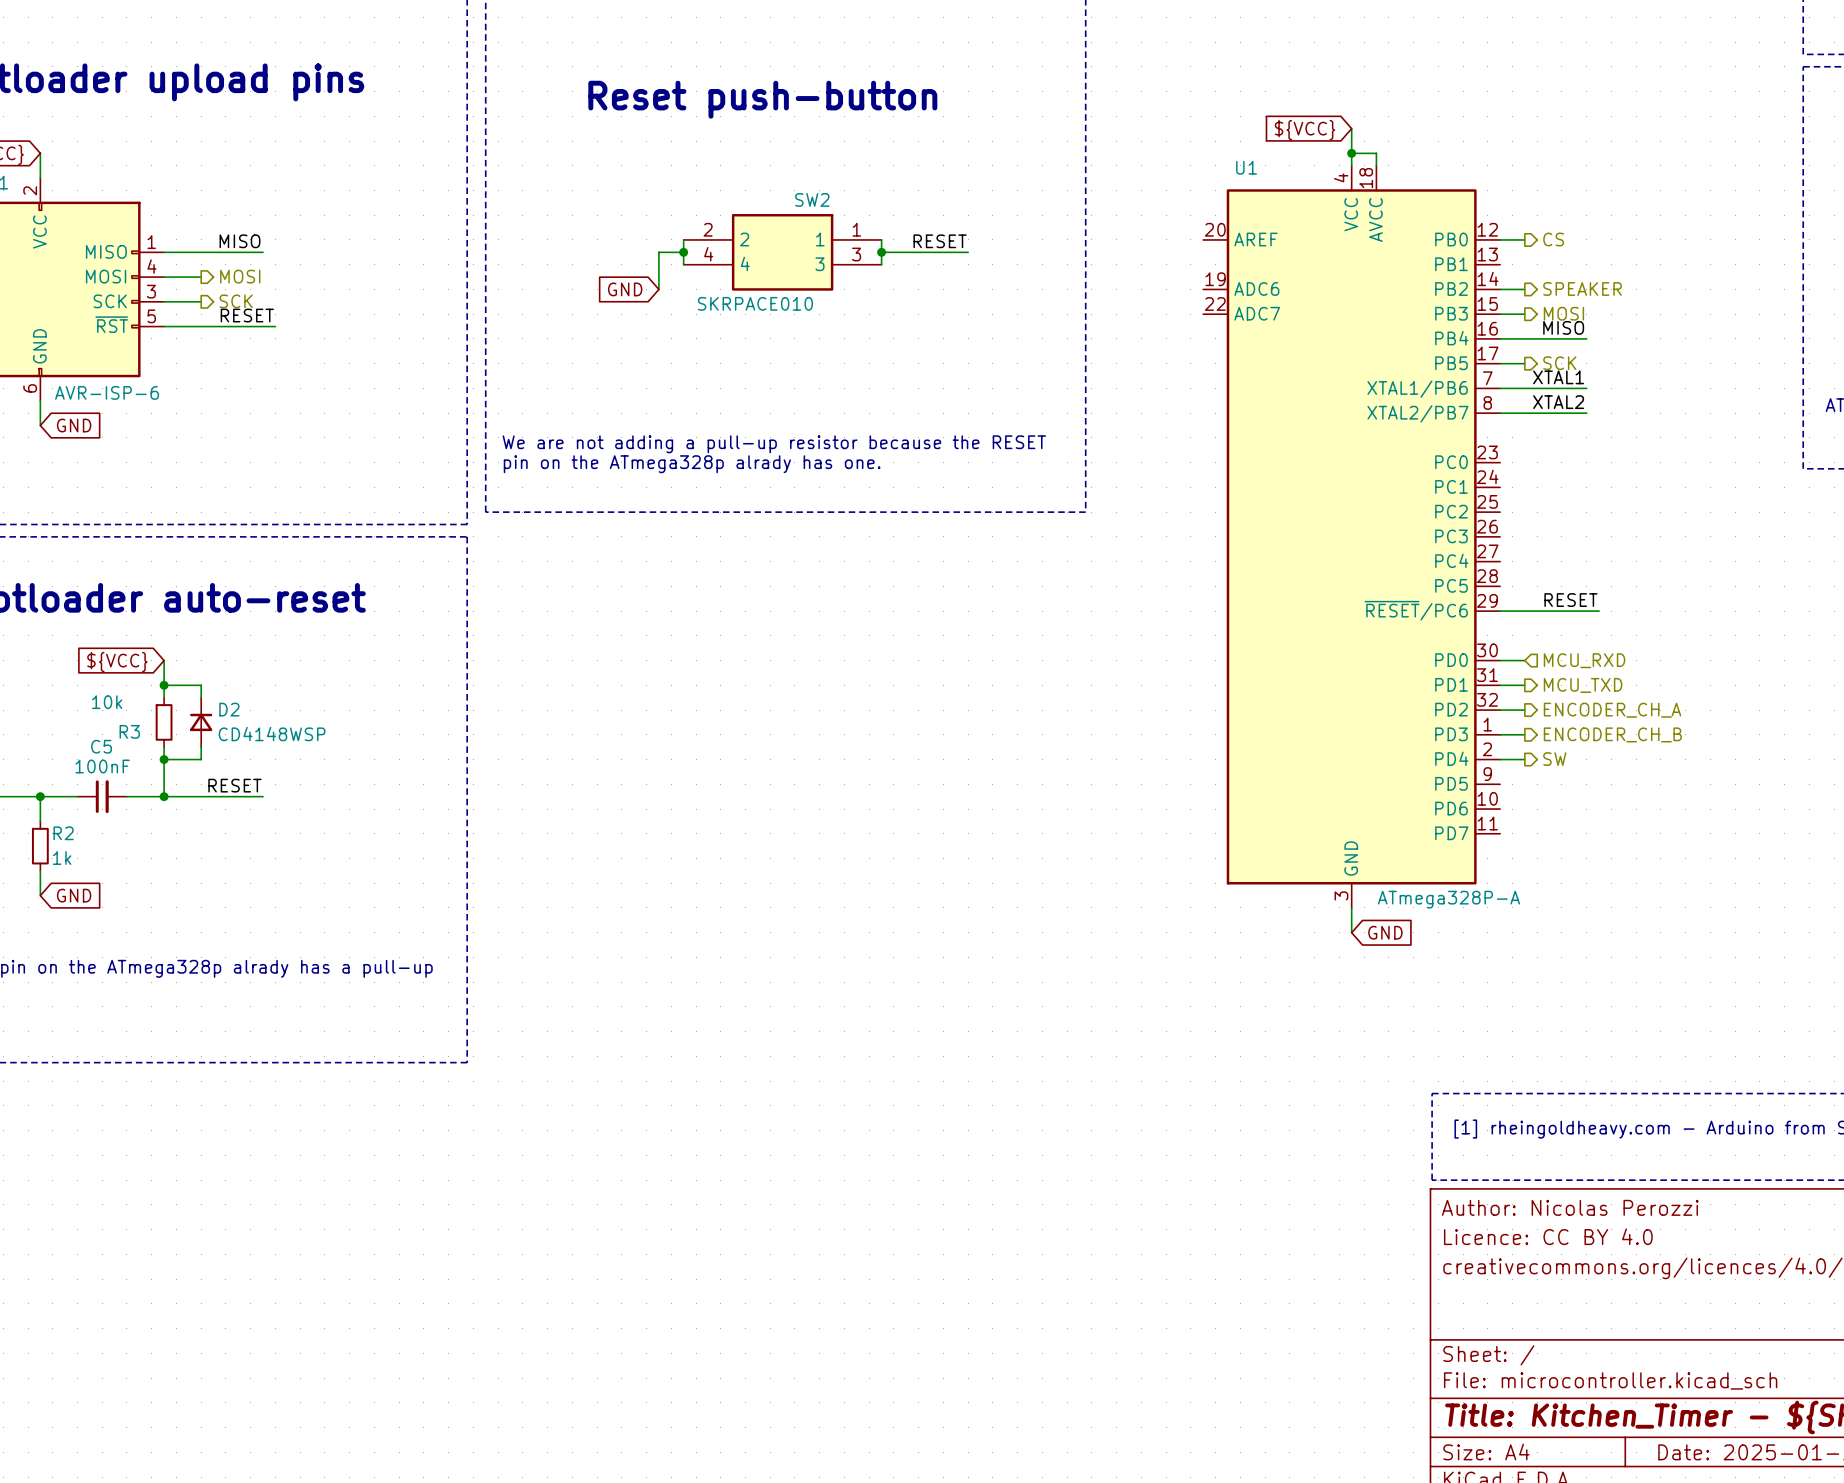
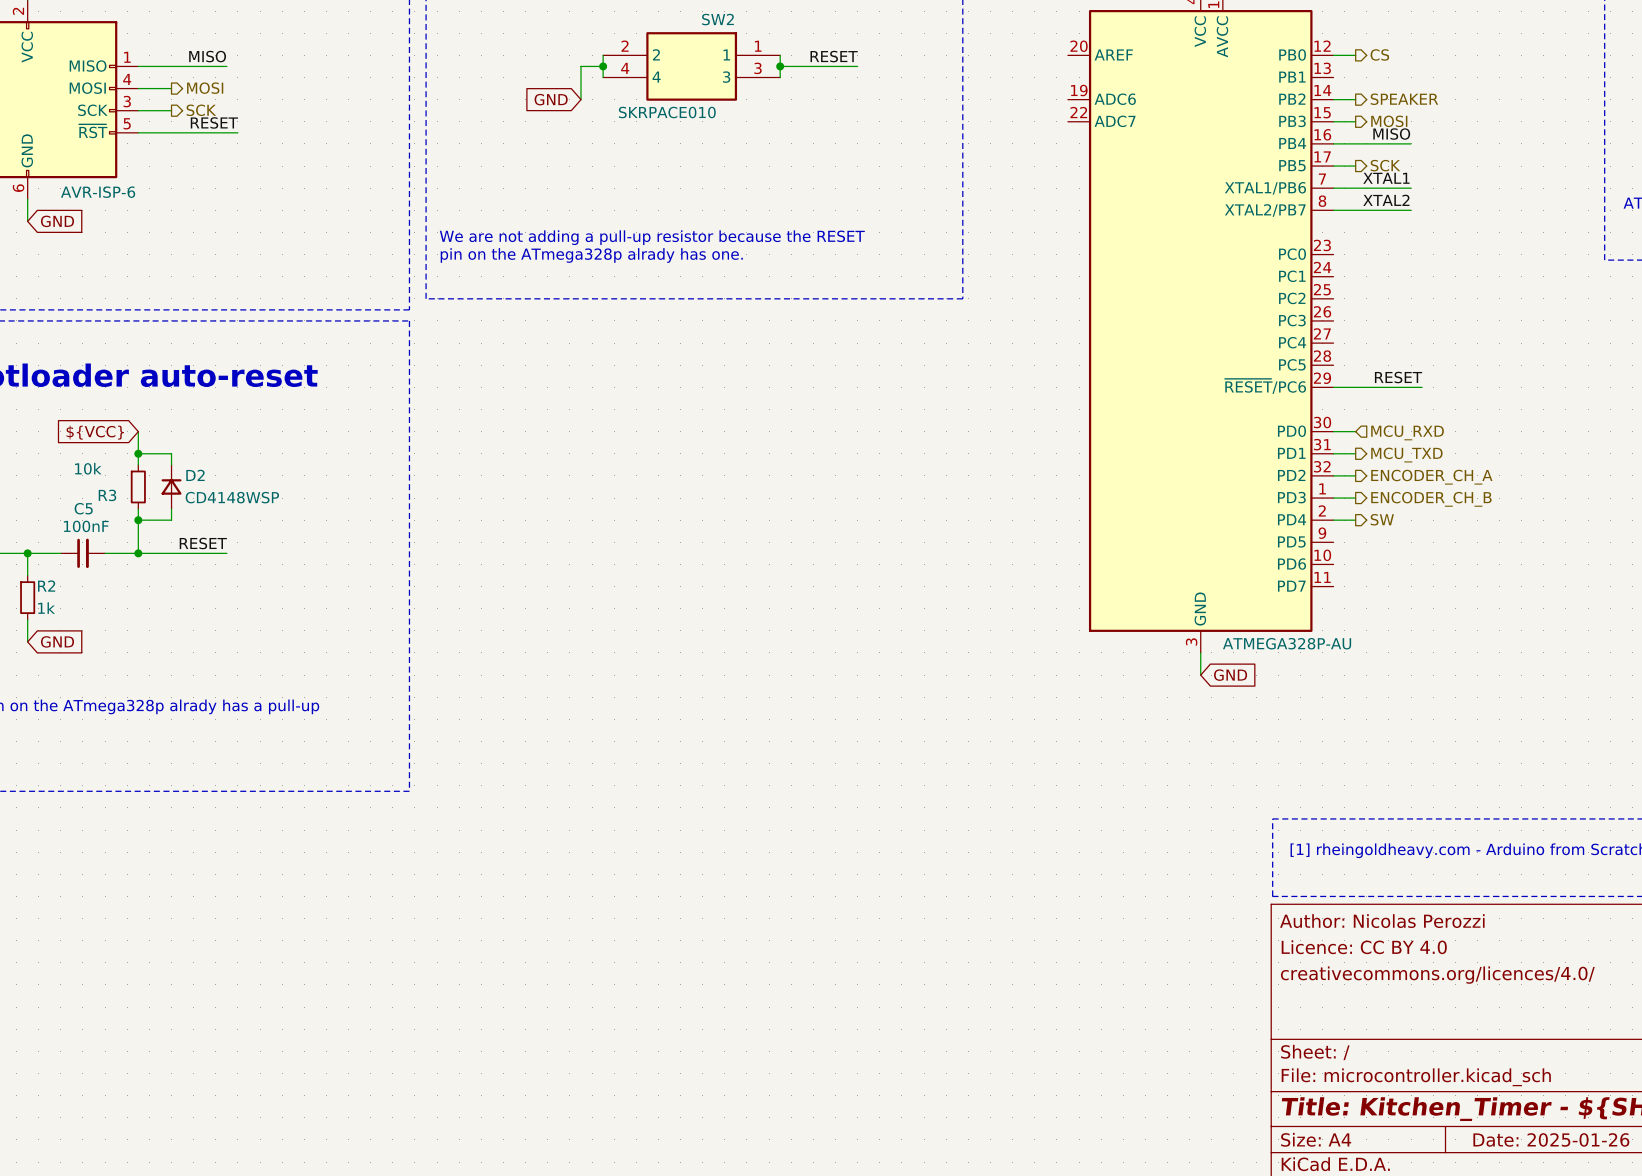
U1 value: ATmega328P-A (1448, 899) -> ATMEGA328P-AU (1287, 643)

